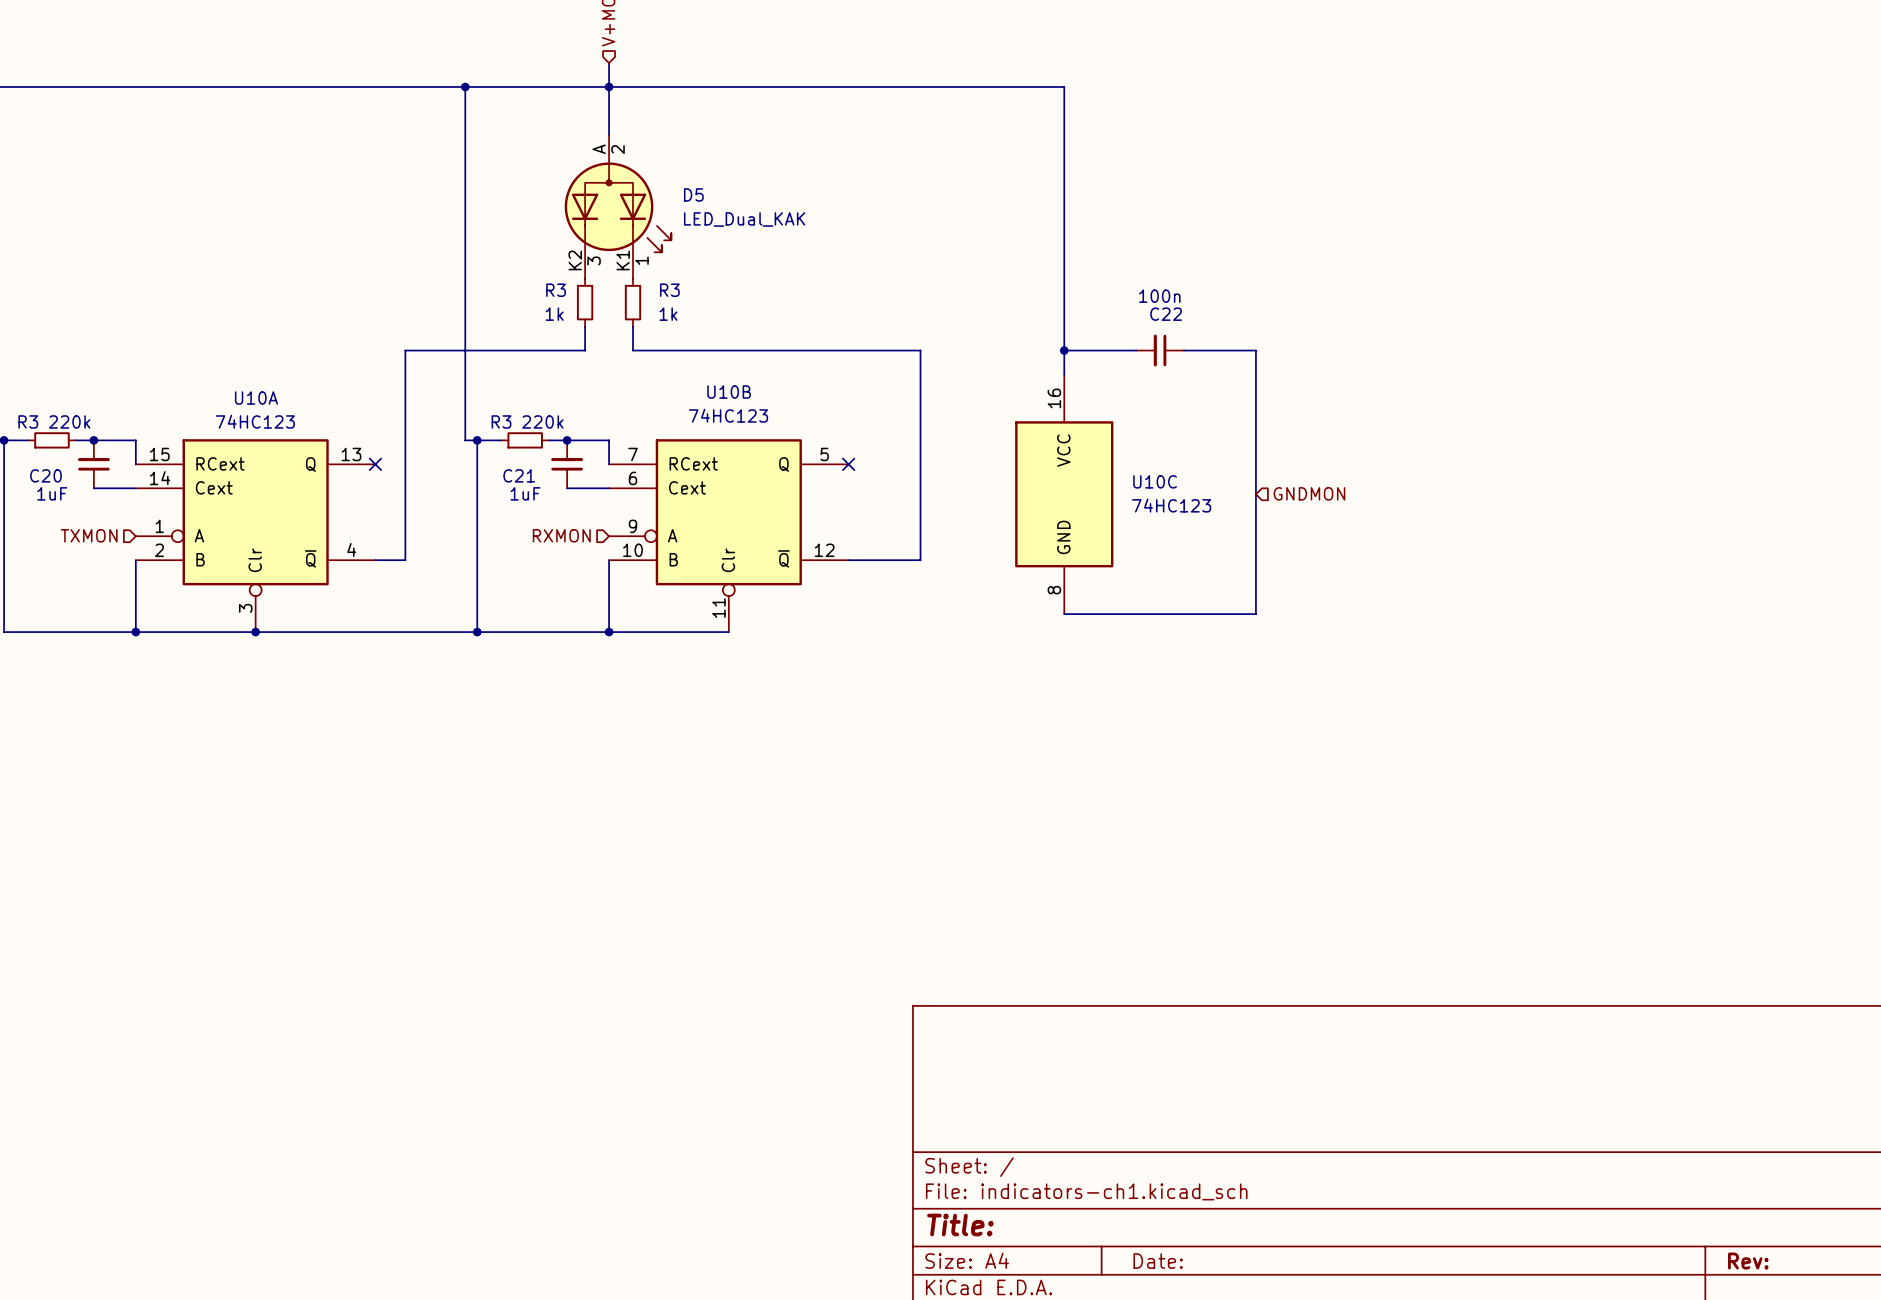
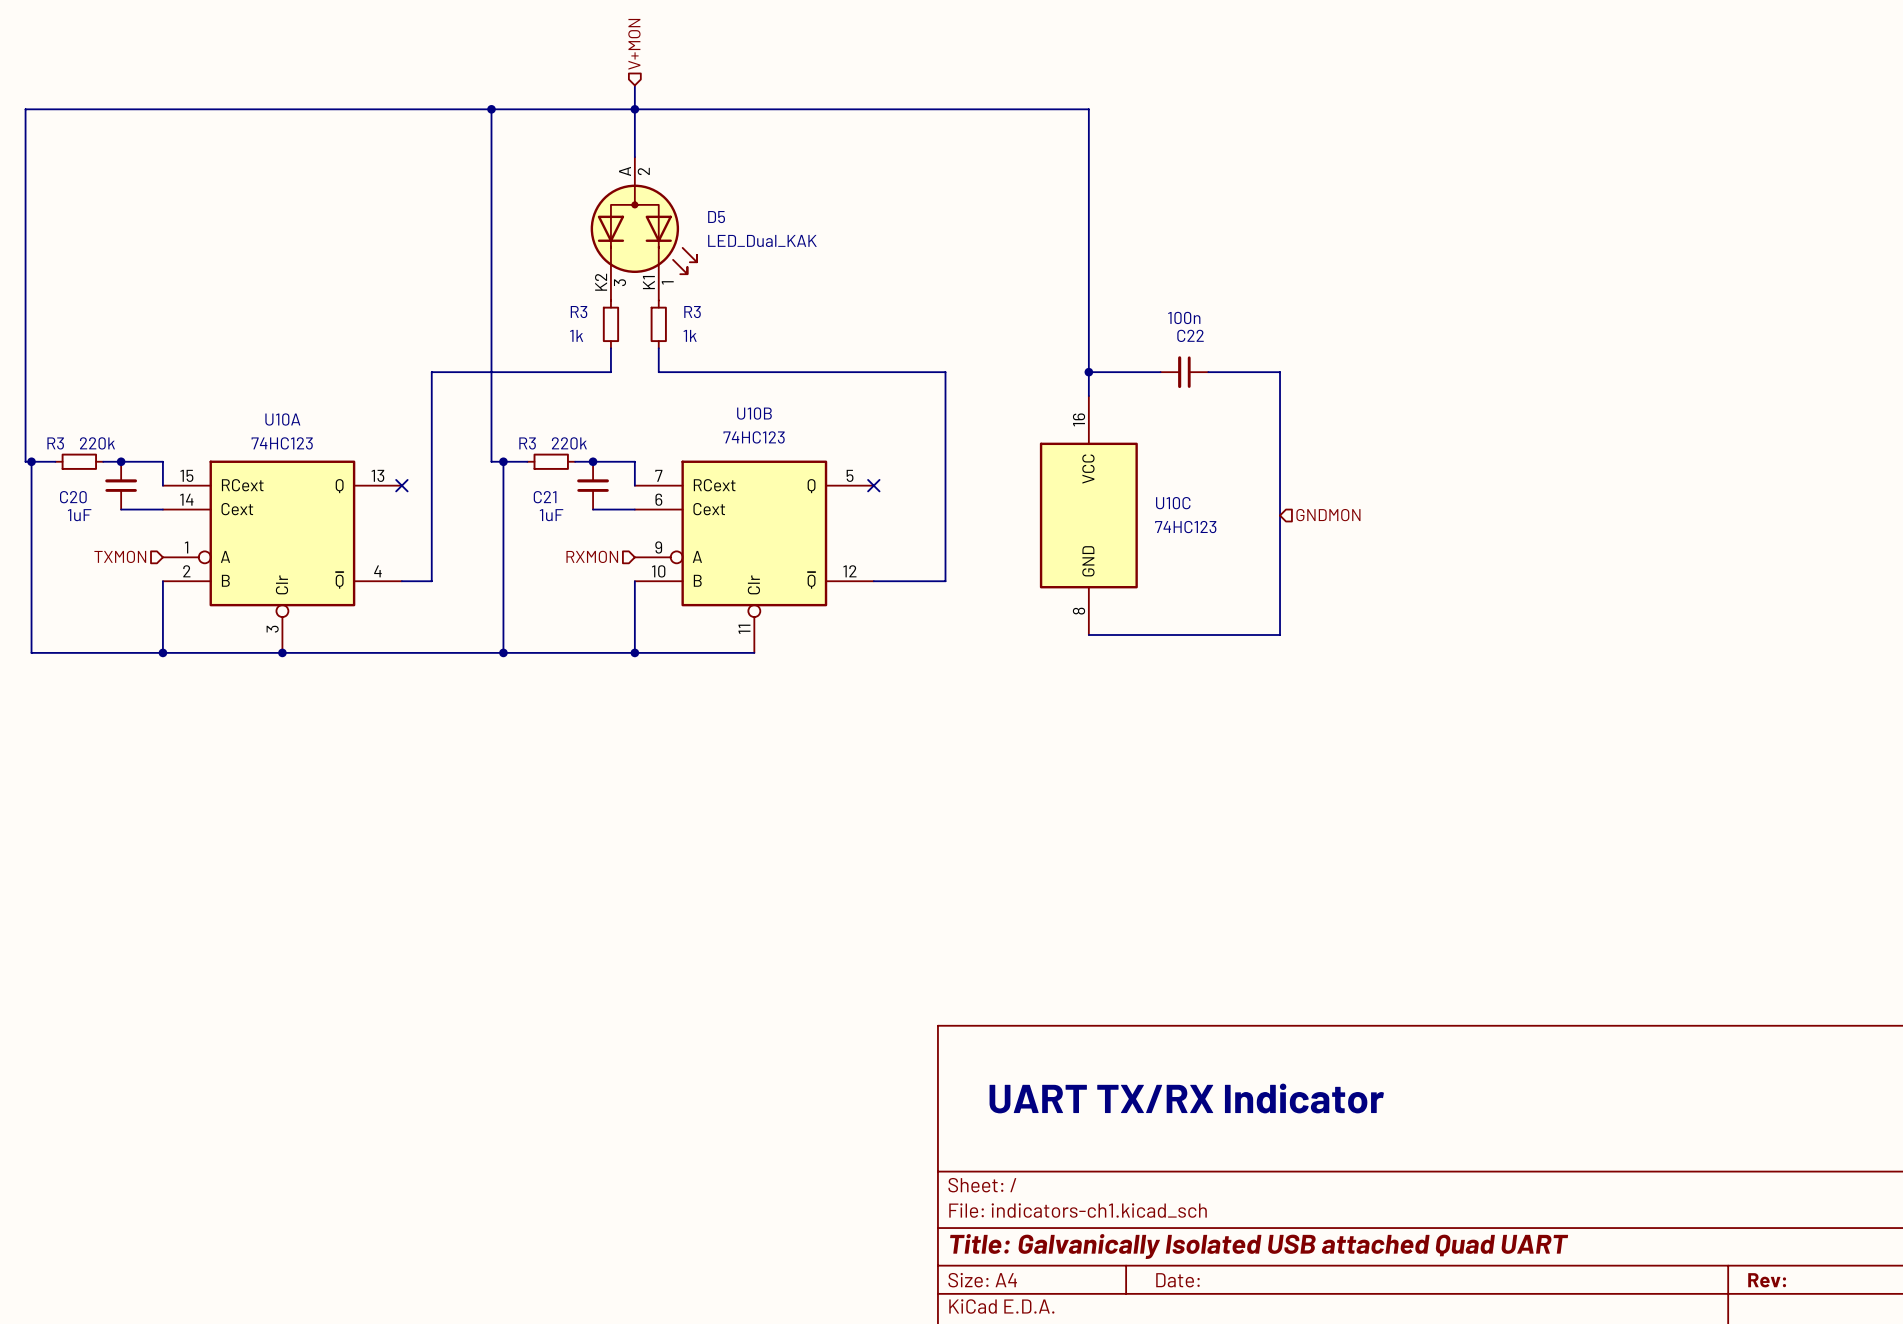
text: none -> UART TX/RX Indicator (1186, 1098)
title block: Title: (960, 1225) -> Title: Galvanically Isolated USB attached Quad UART (1259, 1246)

